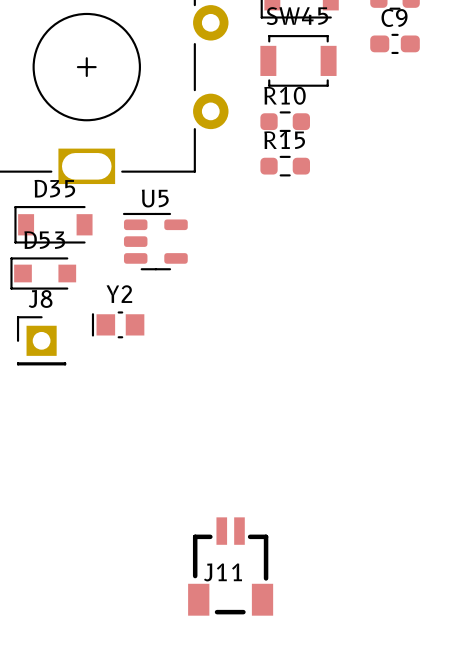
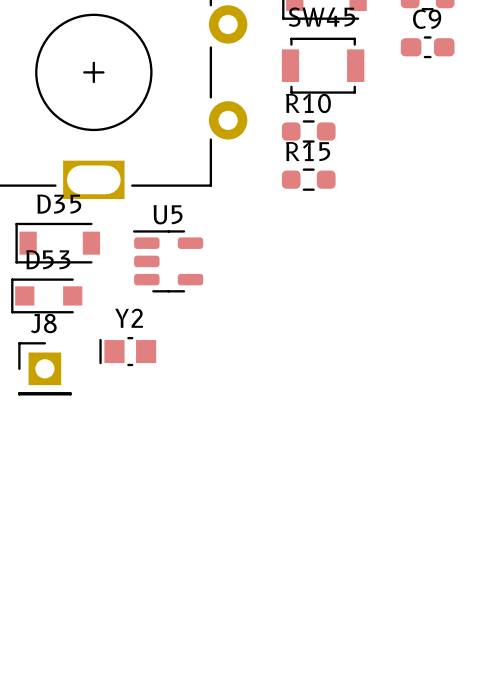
J11: (230, 566) -> none

